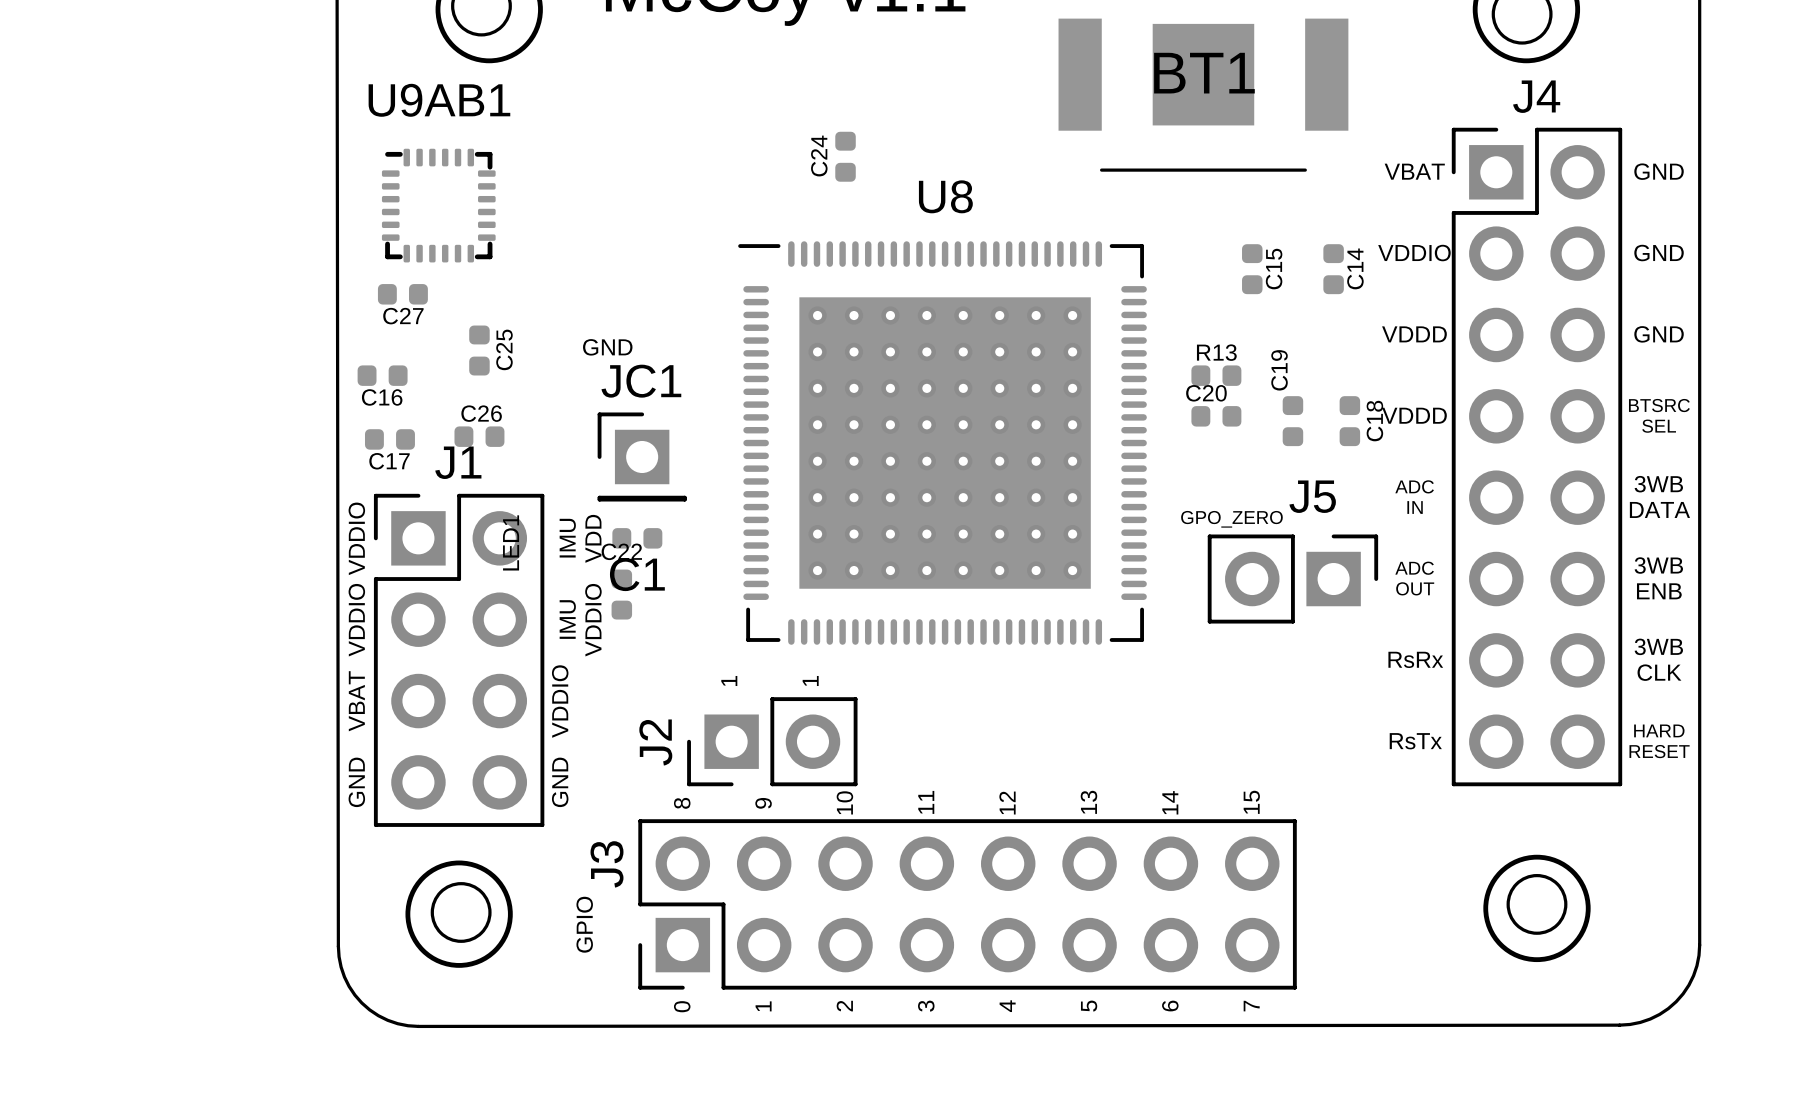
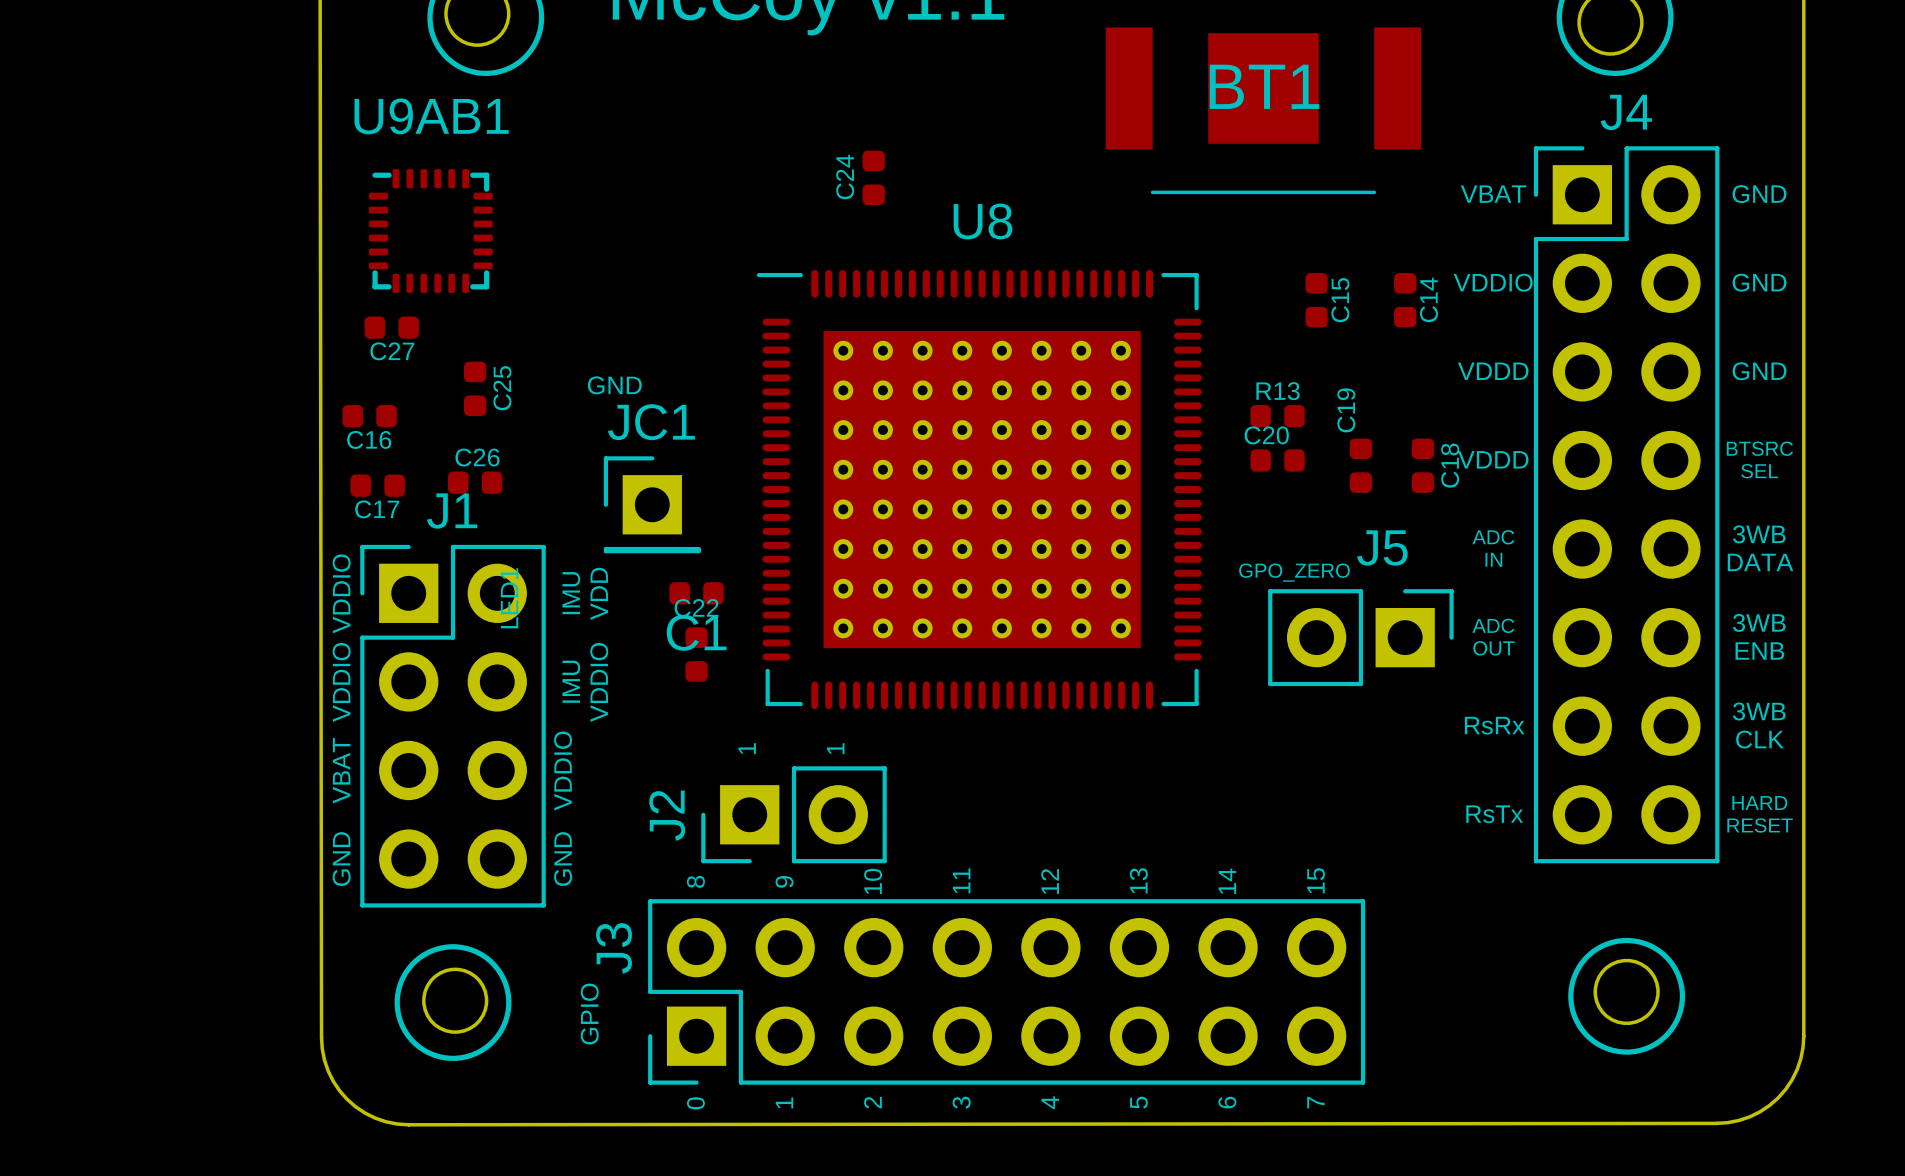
C1 position: (637, 538) -> (696, 593)
C22 position: (621, 594) -> (696, 654)

